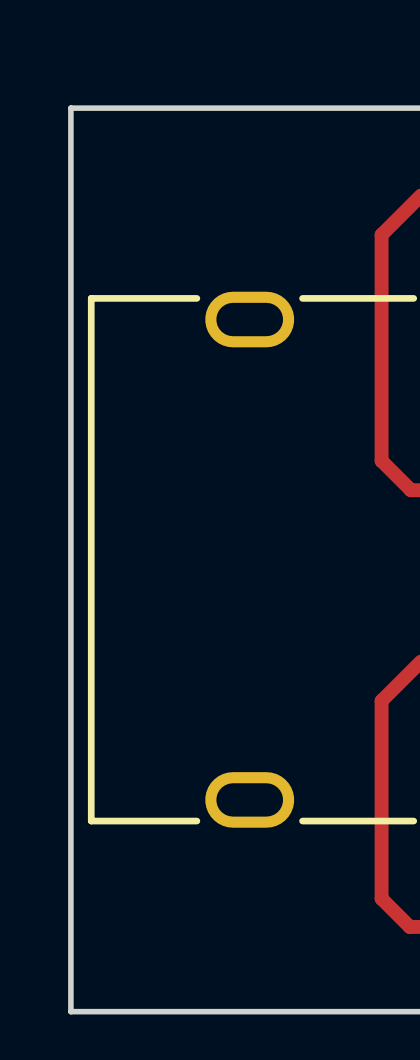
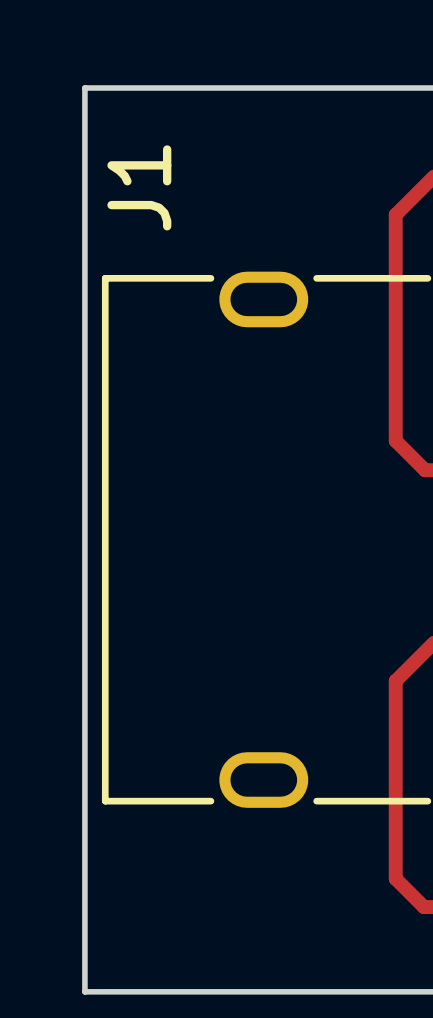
J1 name: none -> J1 (139, 187)

